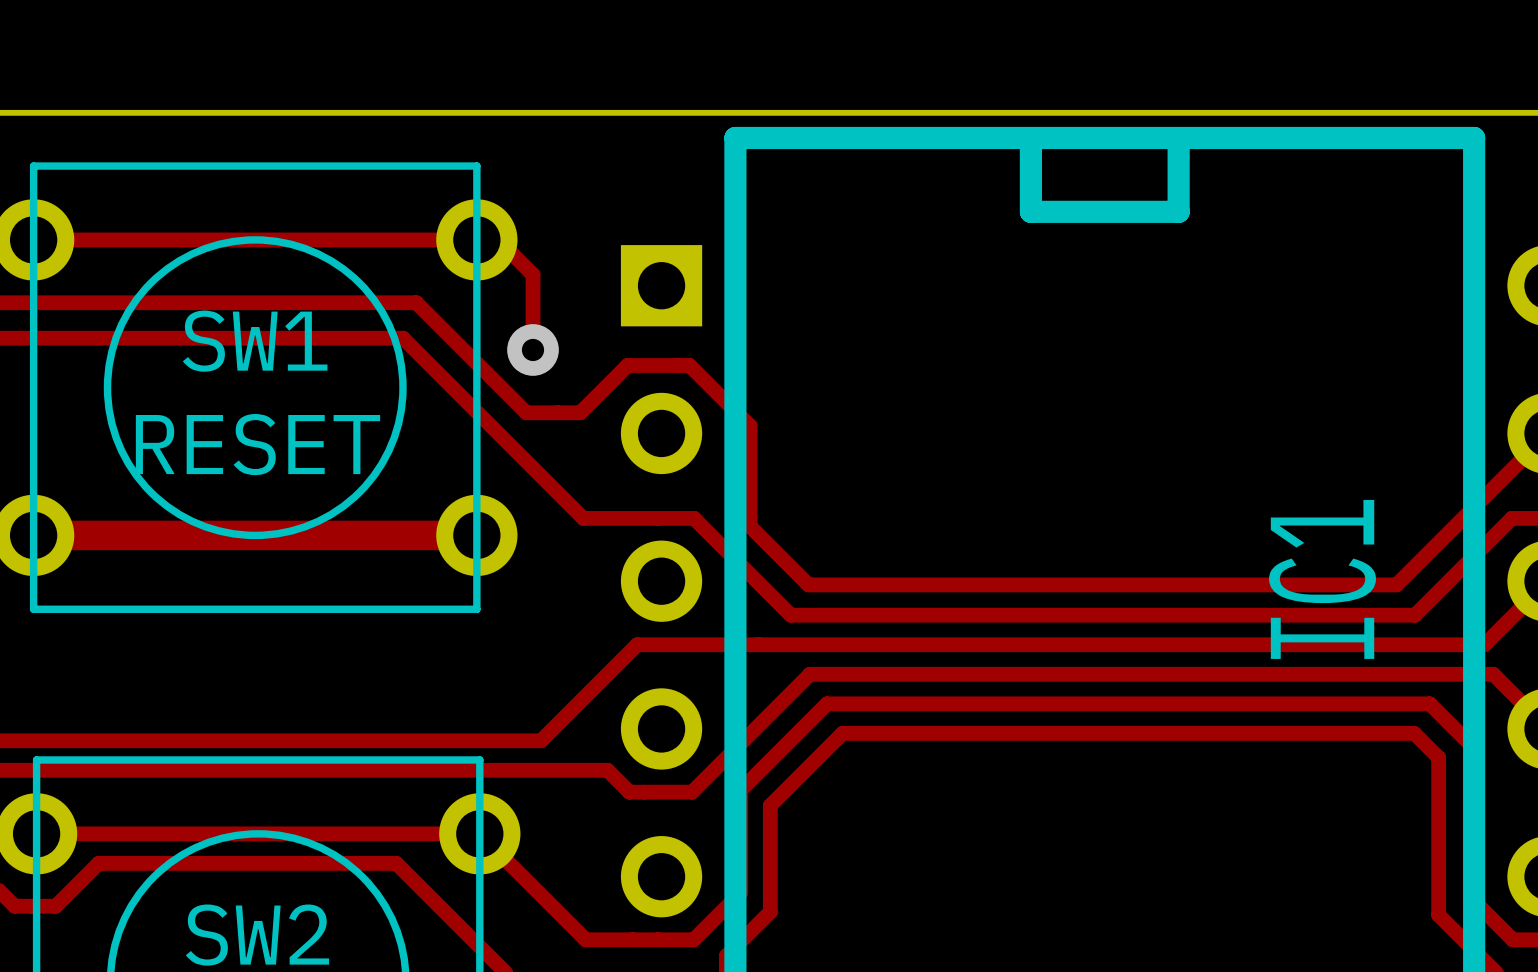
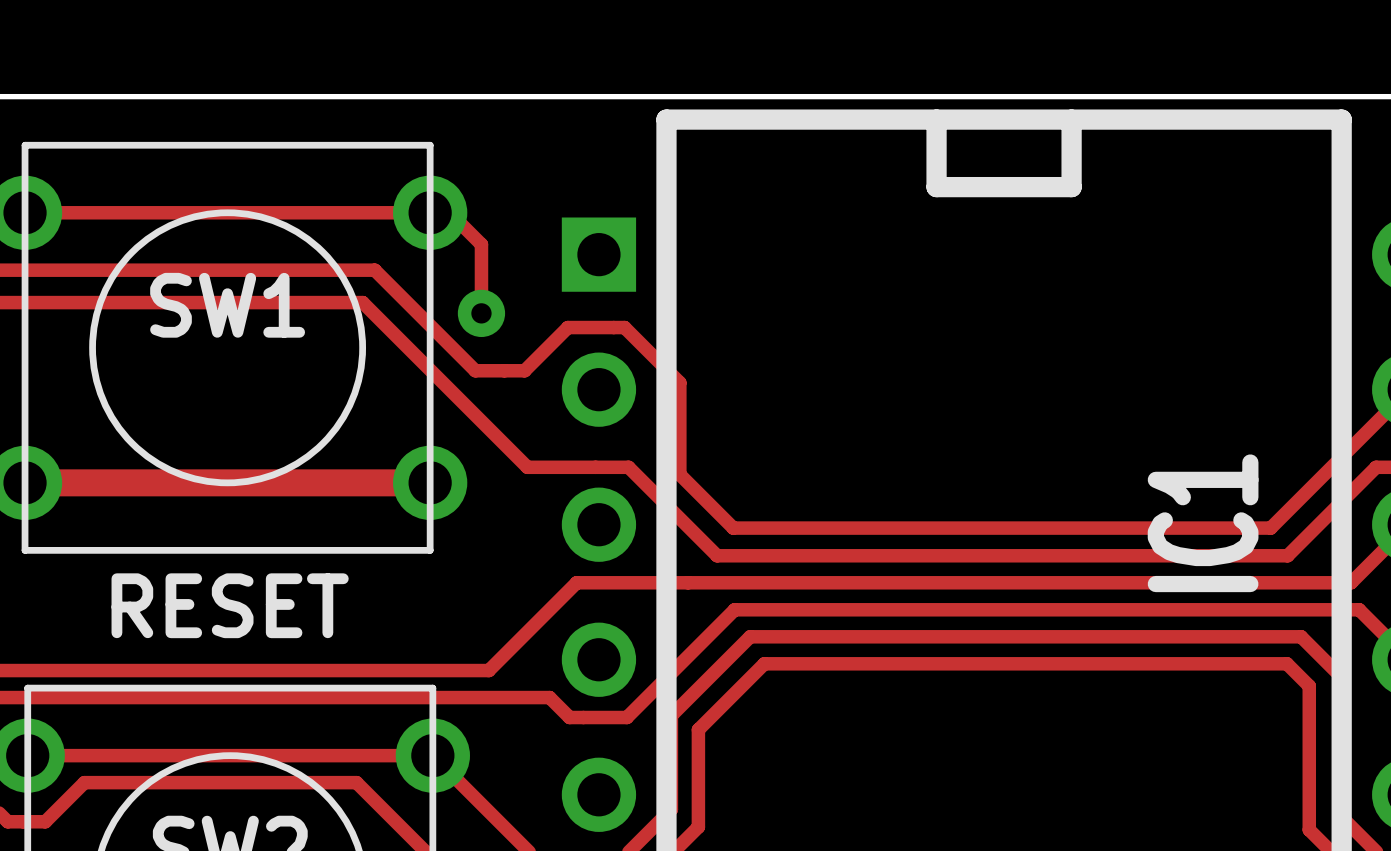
SW1 value position: RESET (258, 444) -> RESET (230, 605)

